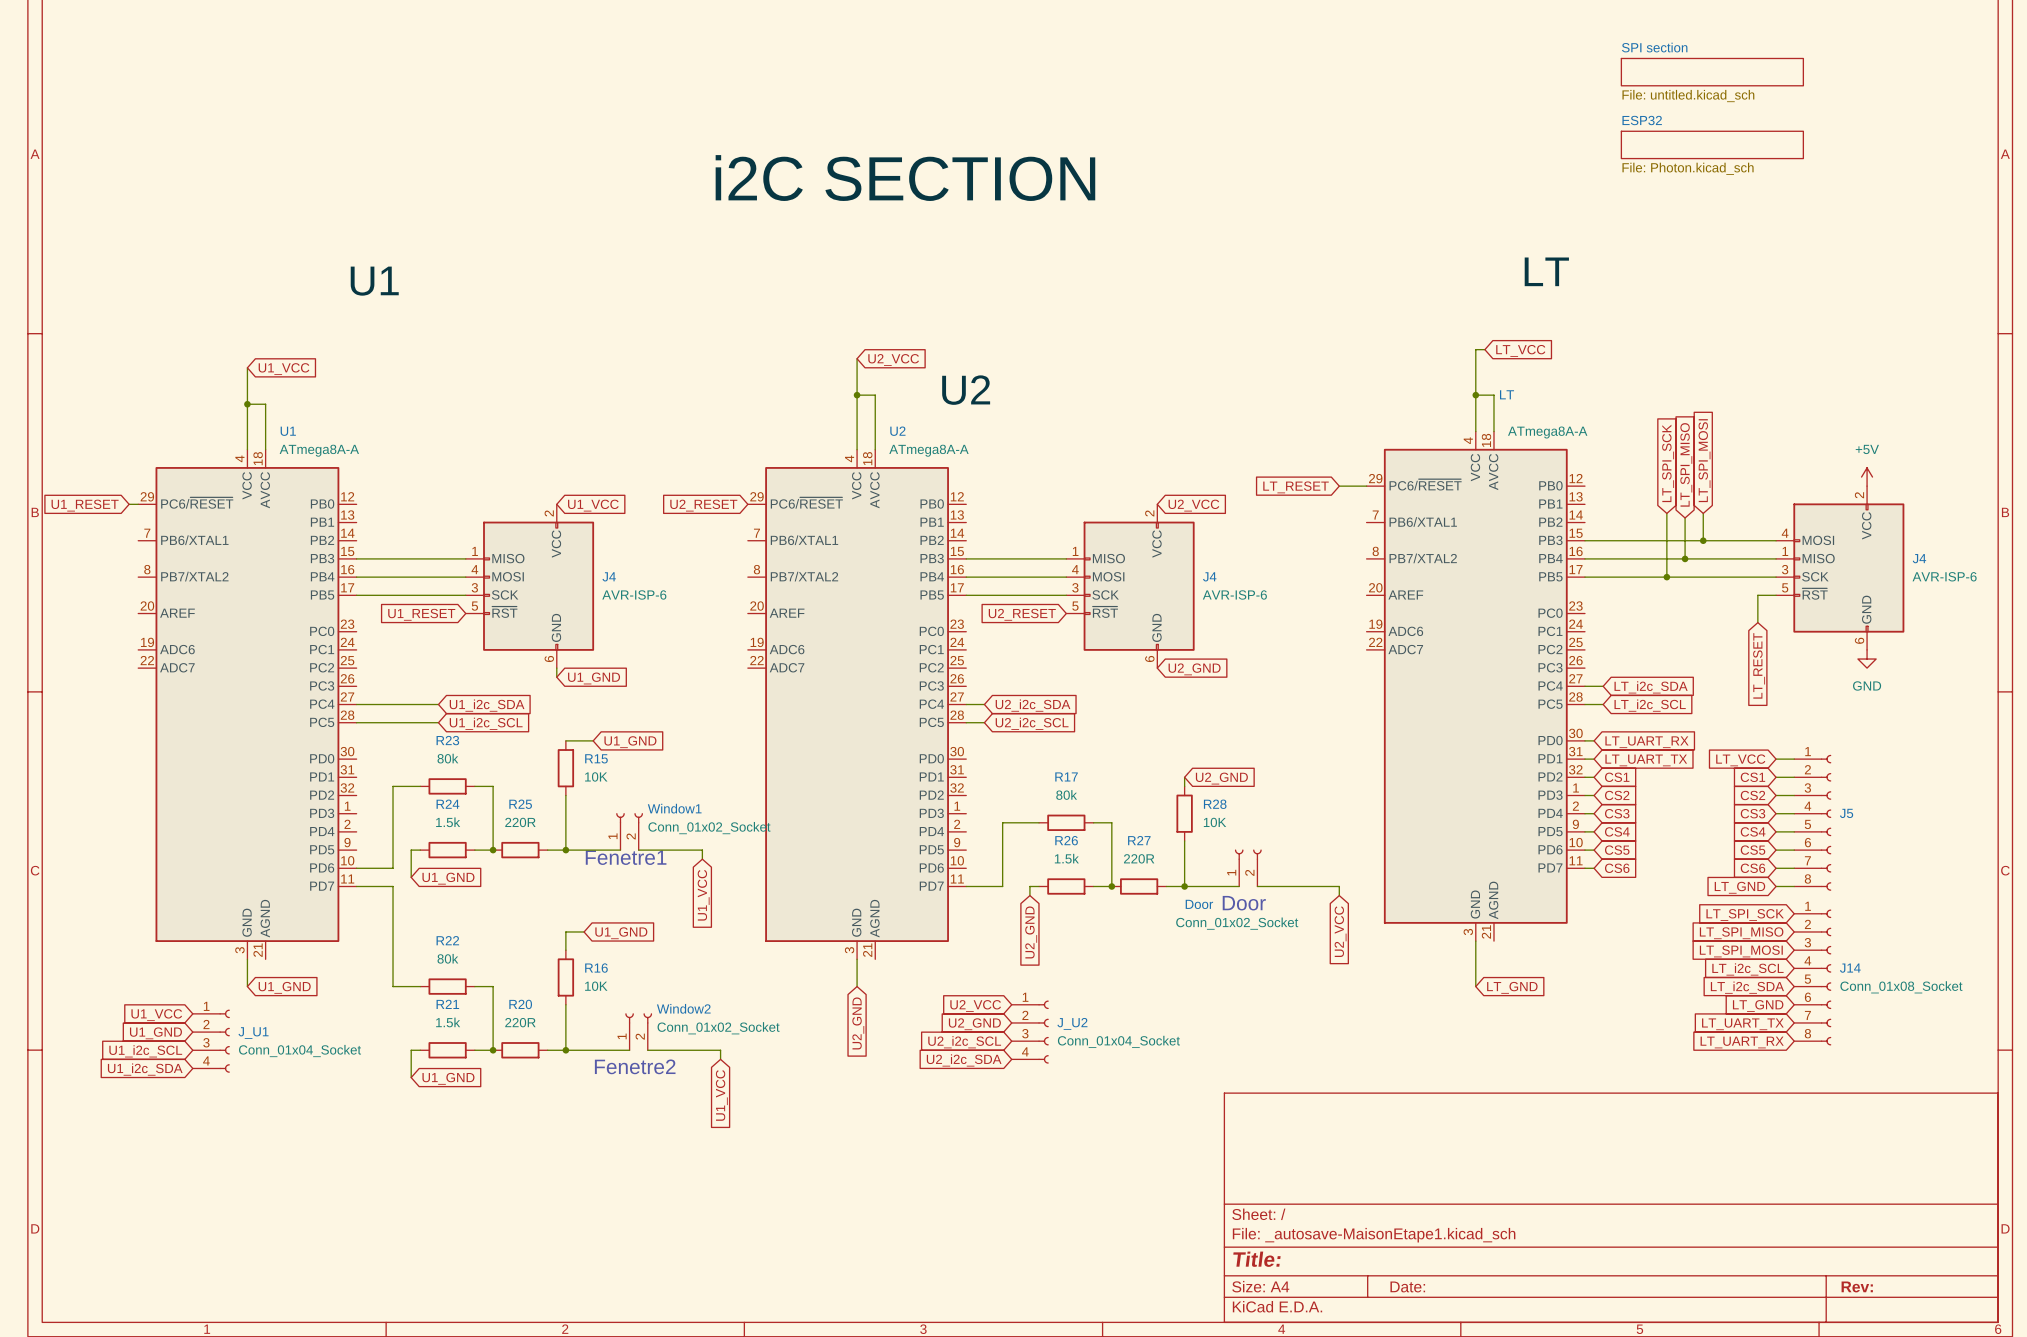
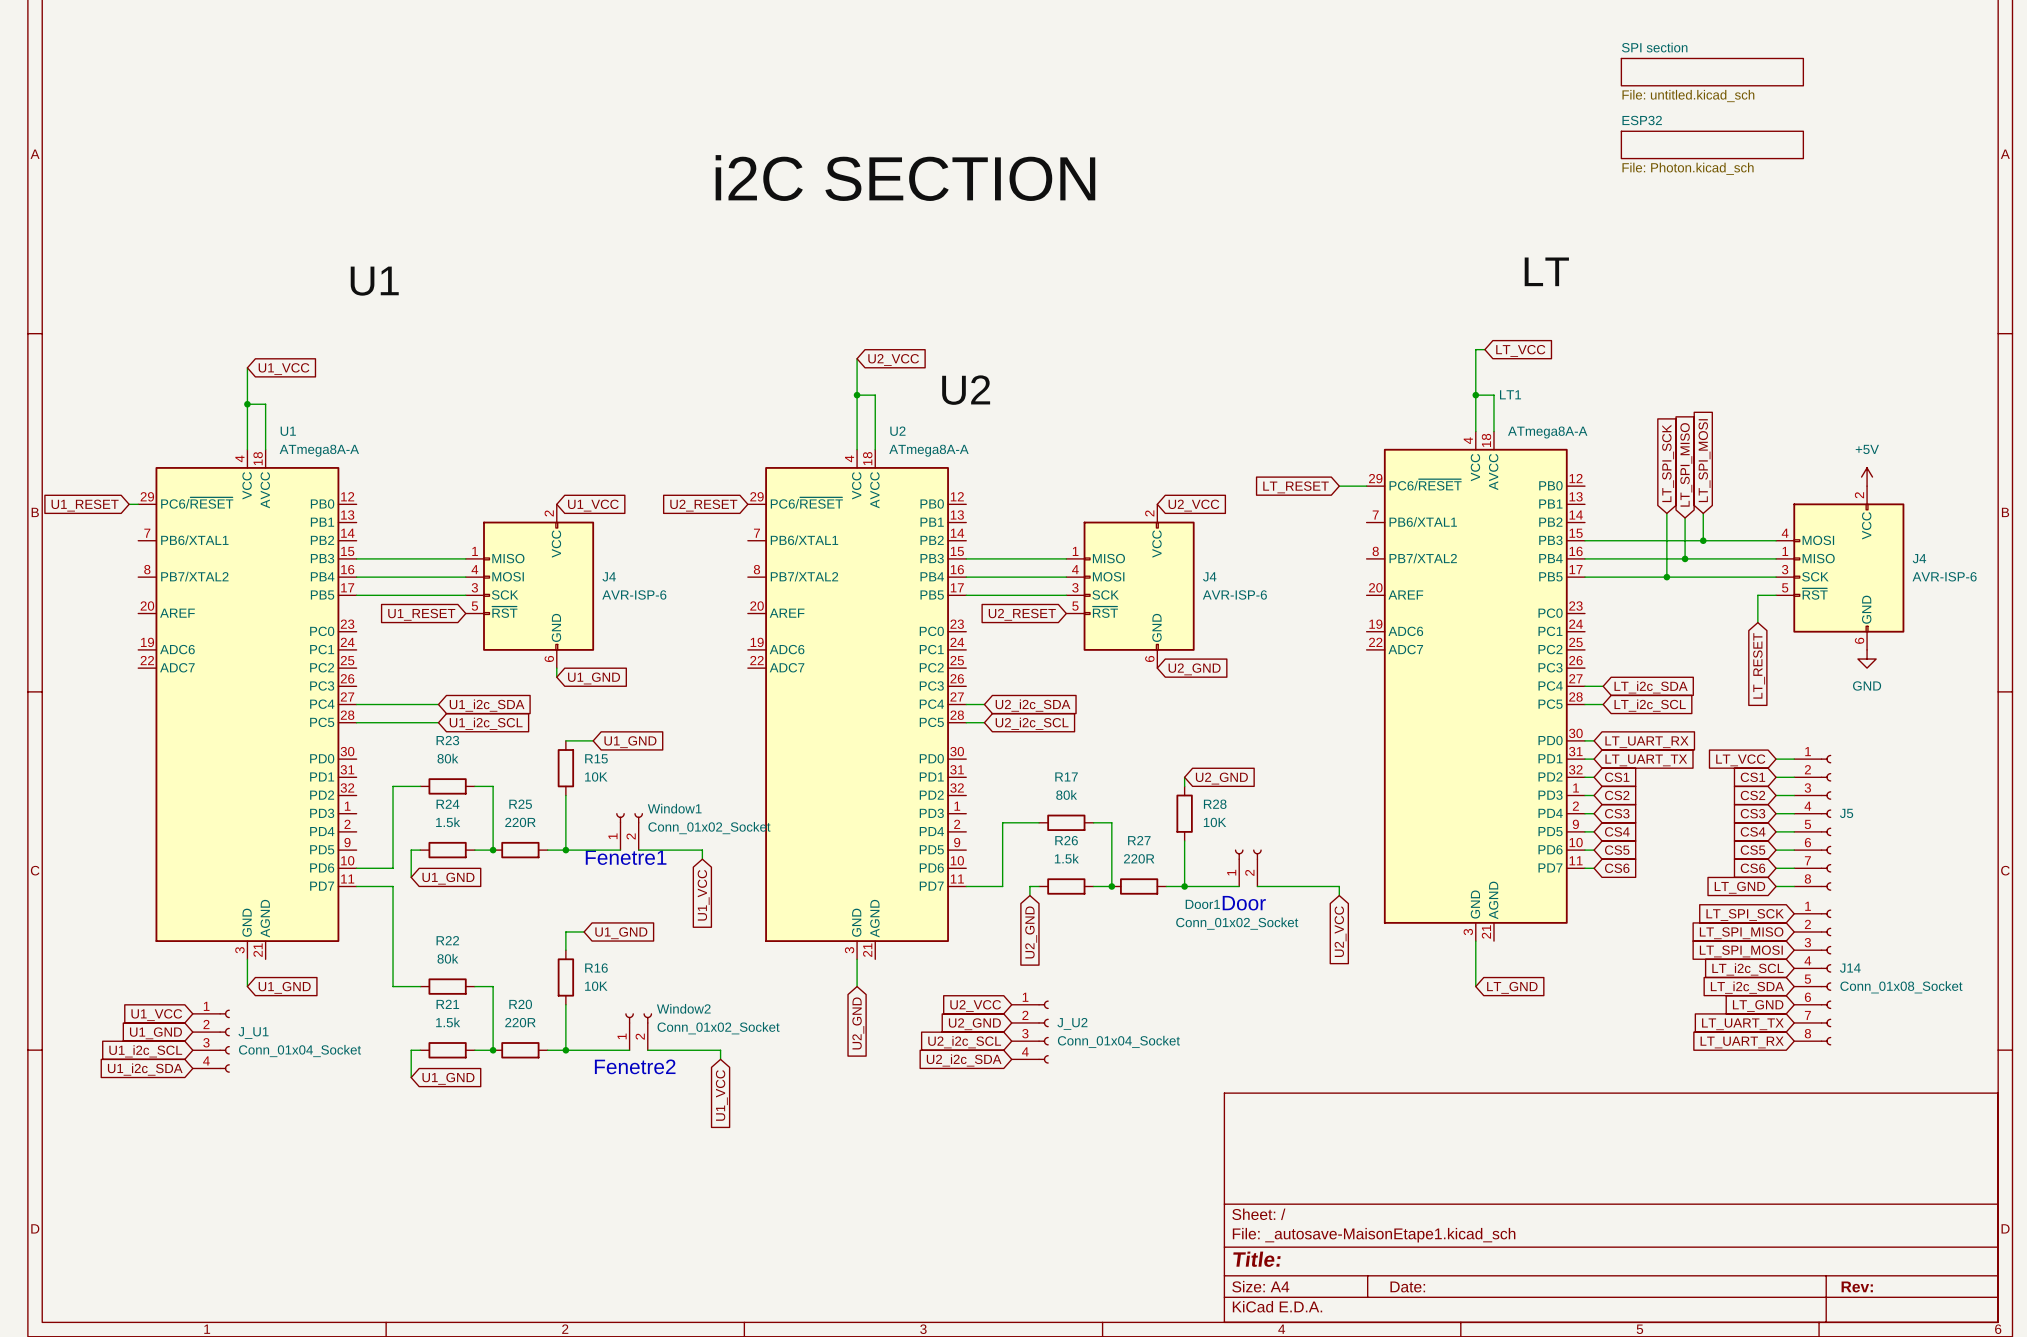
LT name: LT (1507, 394) -> LT1 (1510, 394)
Door name: Door (1199, 904) -> Door1 (1202, 904)

